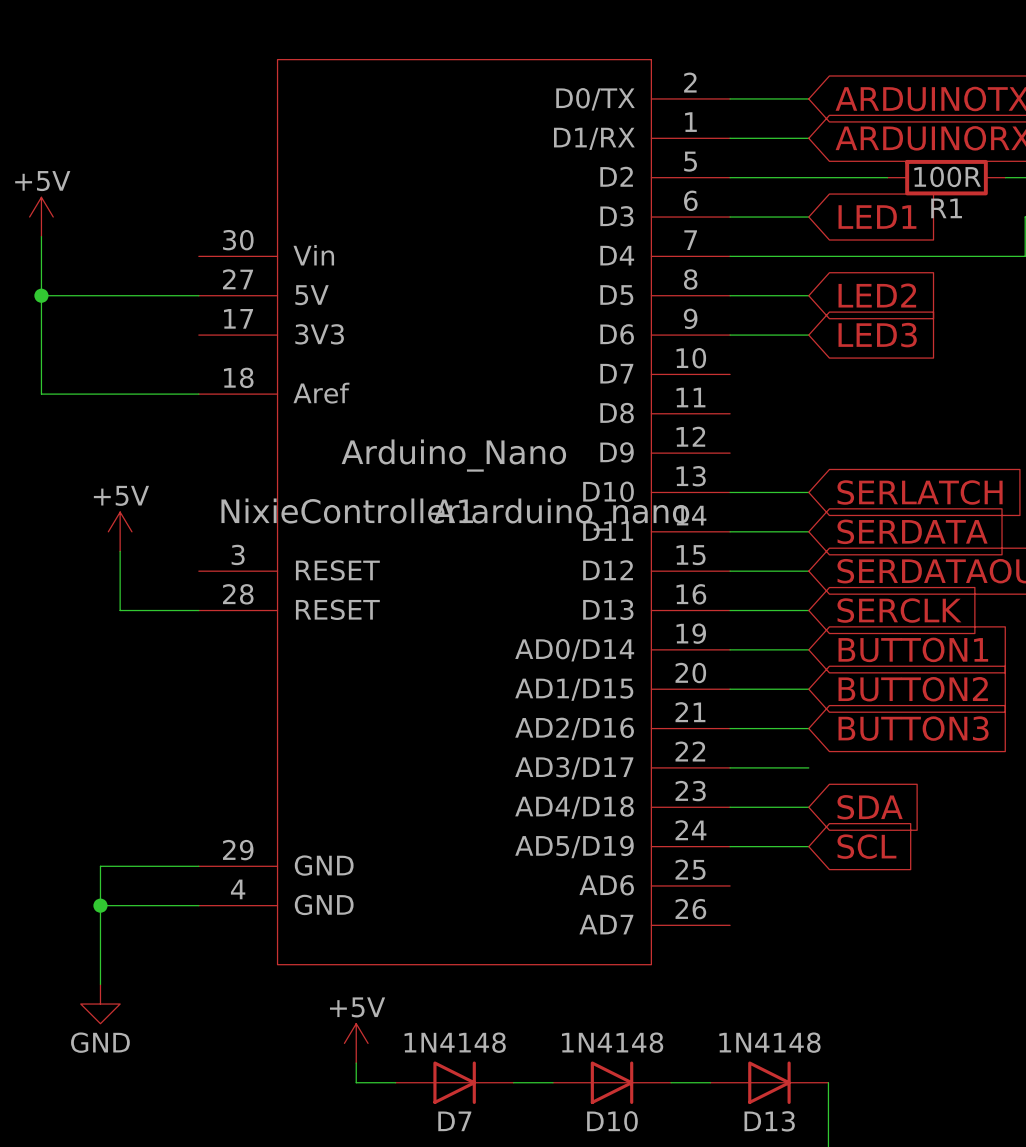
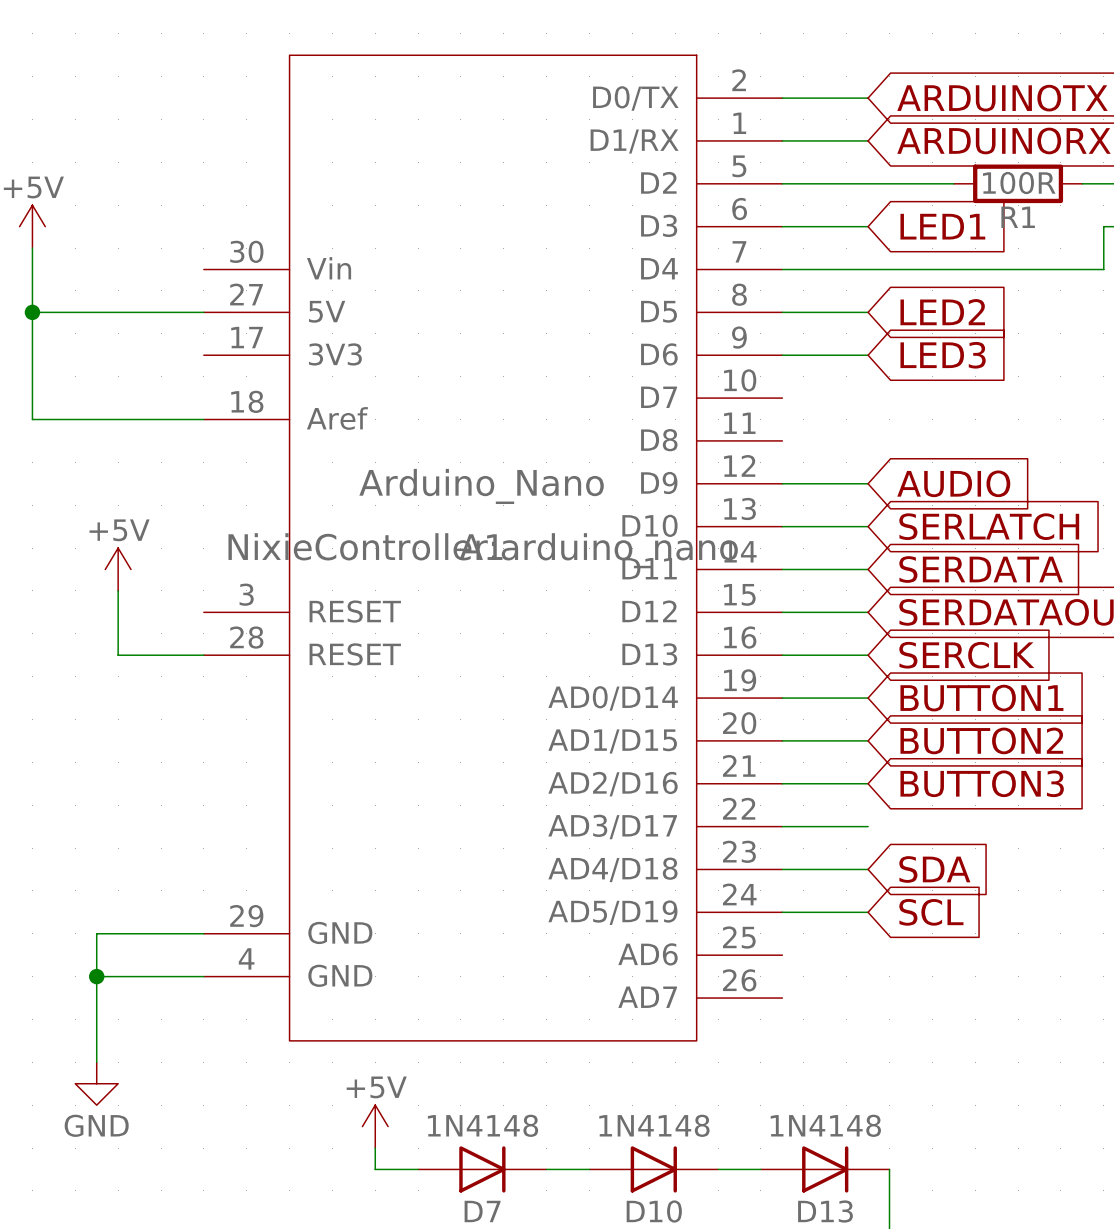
wire: none -> (782, 483) (868, 483)
global label: none -> AUDIO (953, 483)

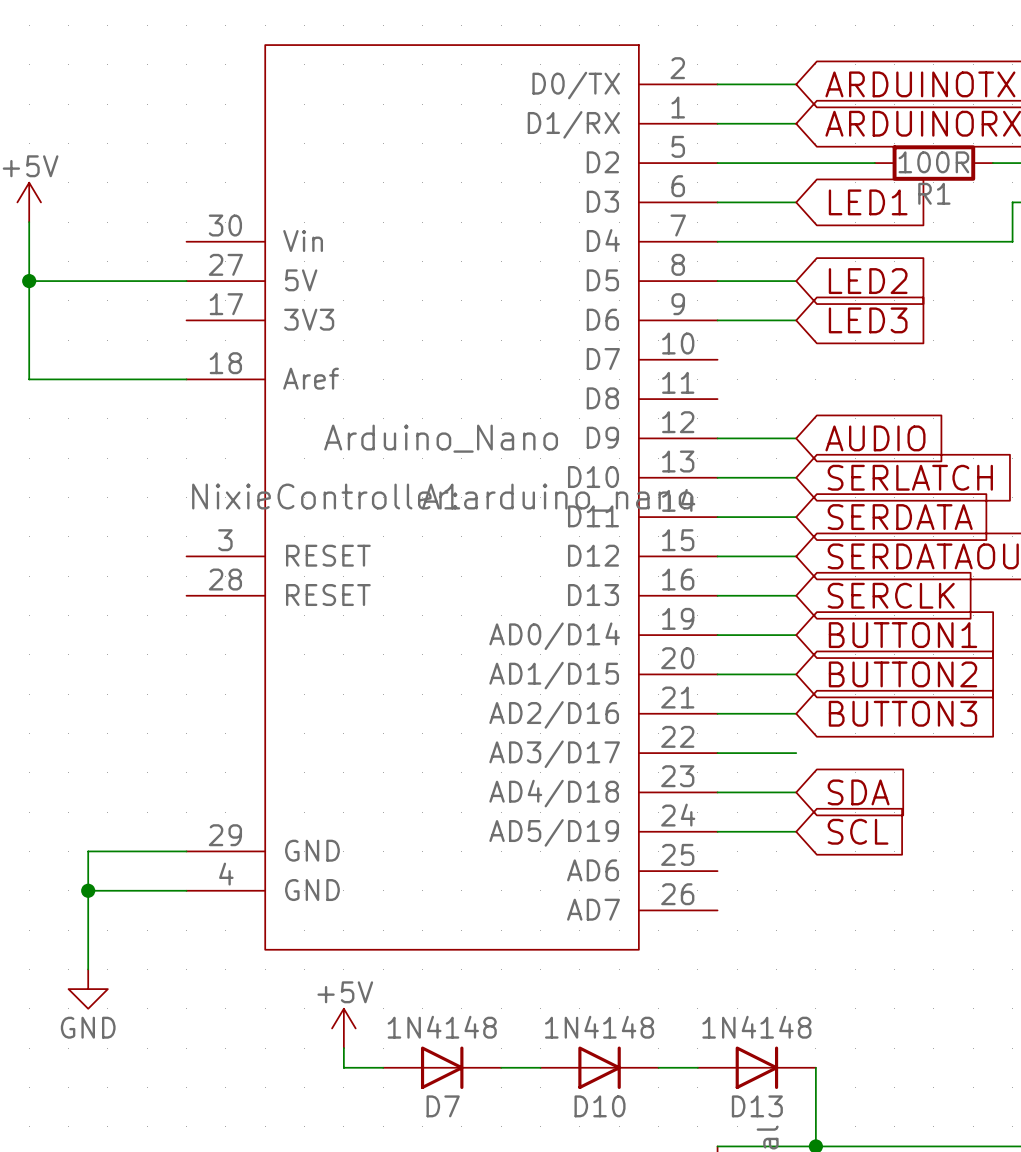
power symbol: +5V (118, 569) -> none
wire: (118, 590) (118, 655) (203, 655) -> none

